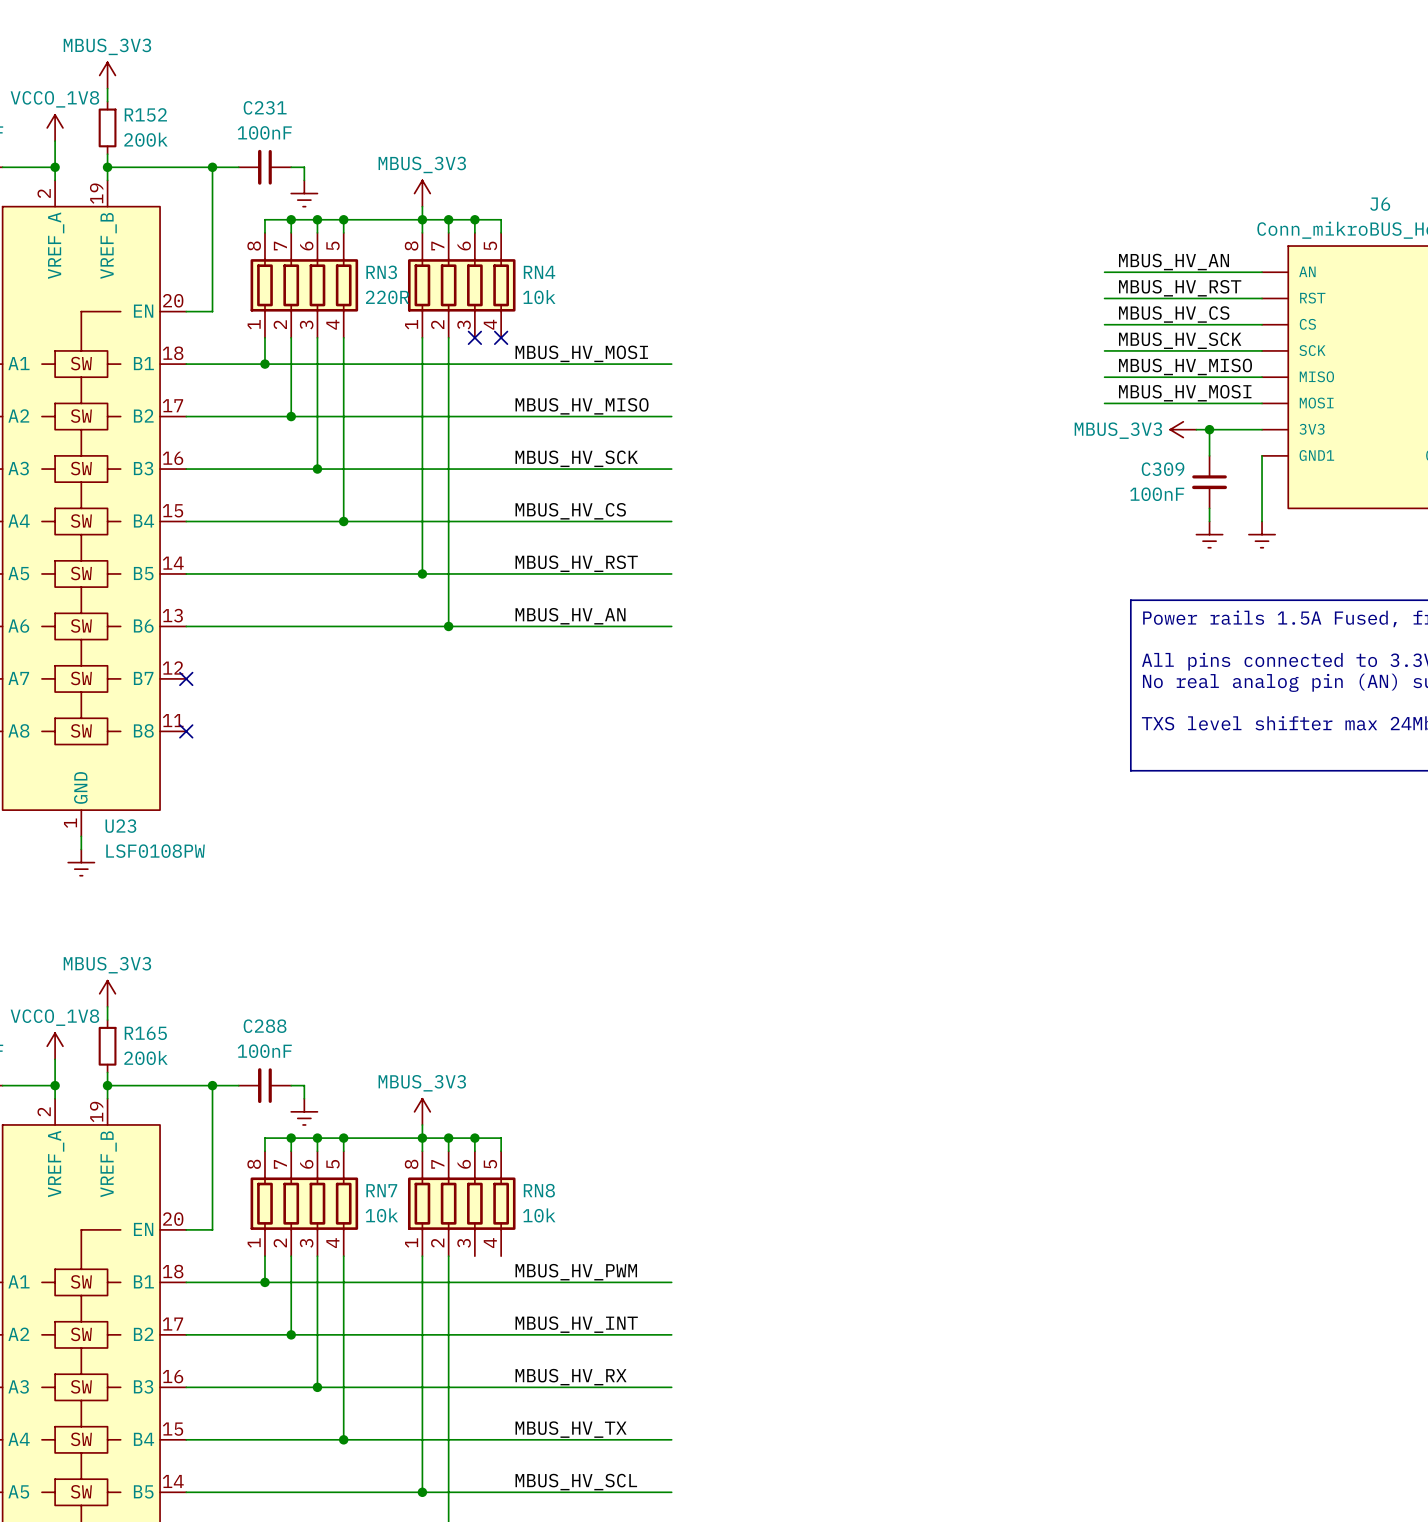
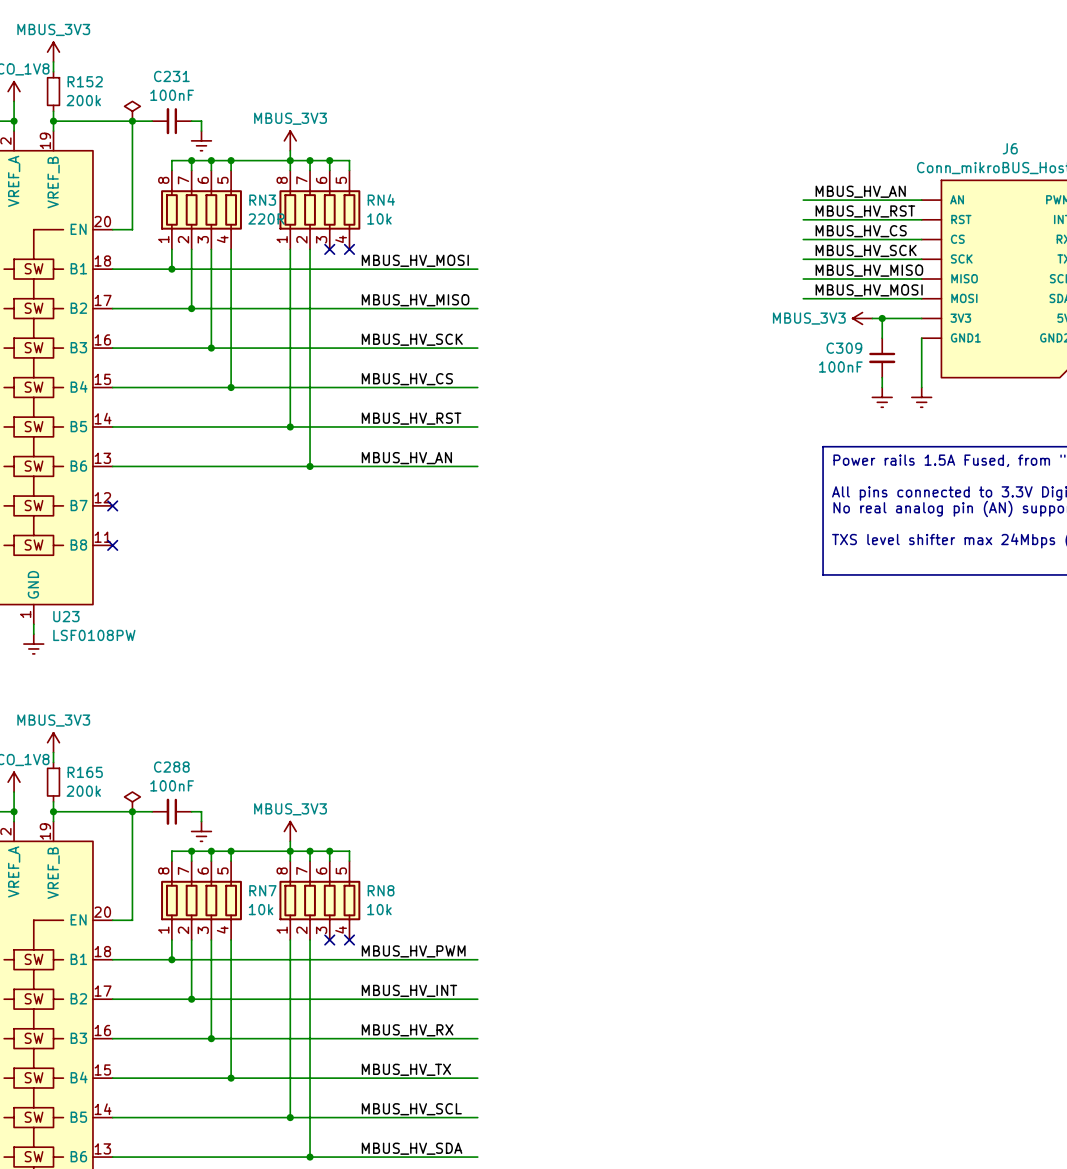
power symbol: none -> (132, 111)
power symbol: none -> (132, 801)
no-connect mark: none -> (329, 940)
no-connect mark: none -> (349, 940)

